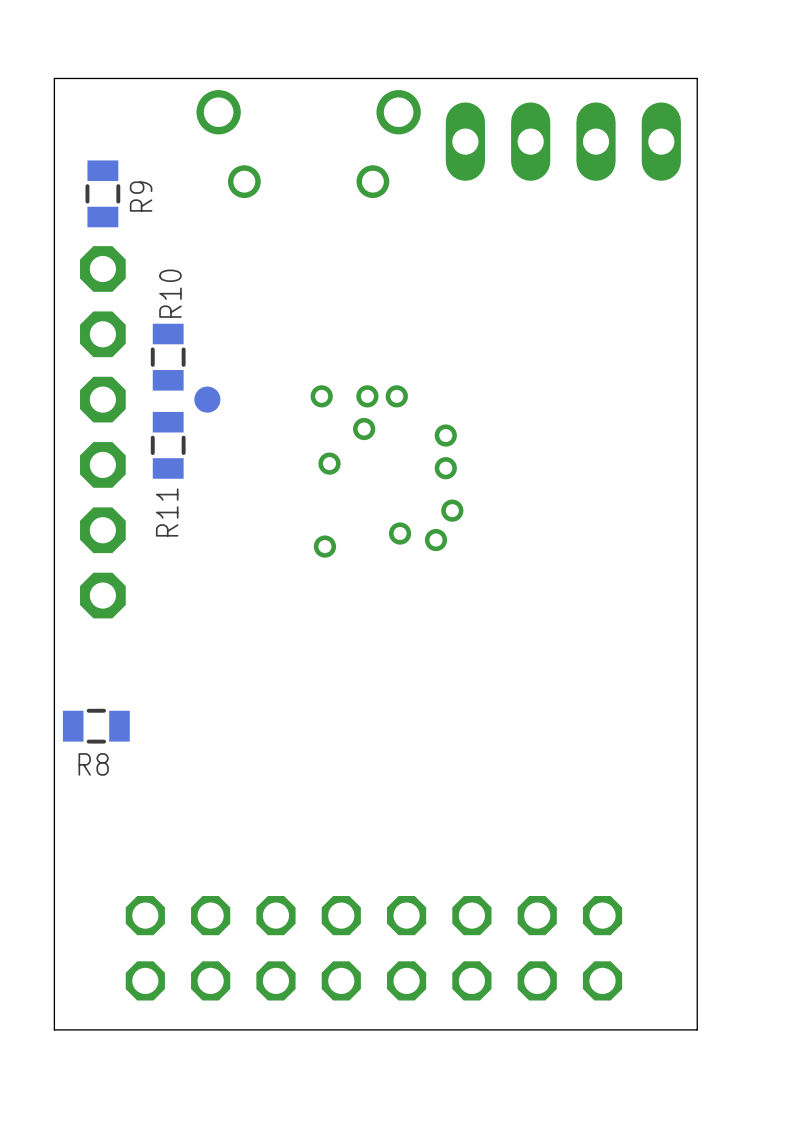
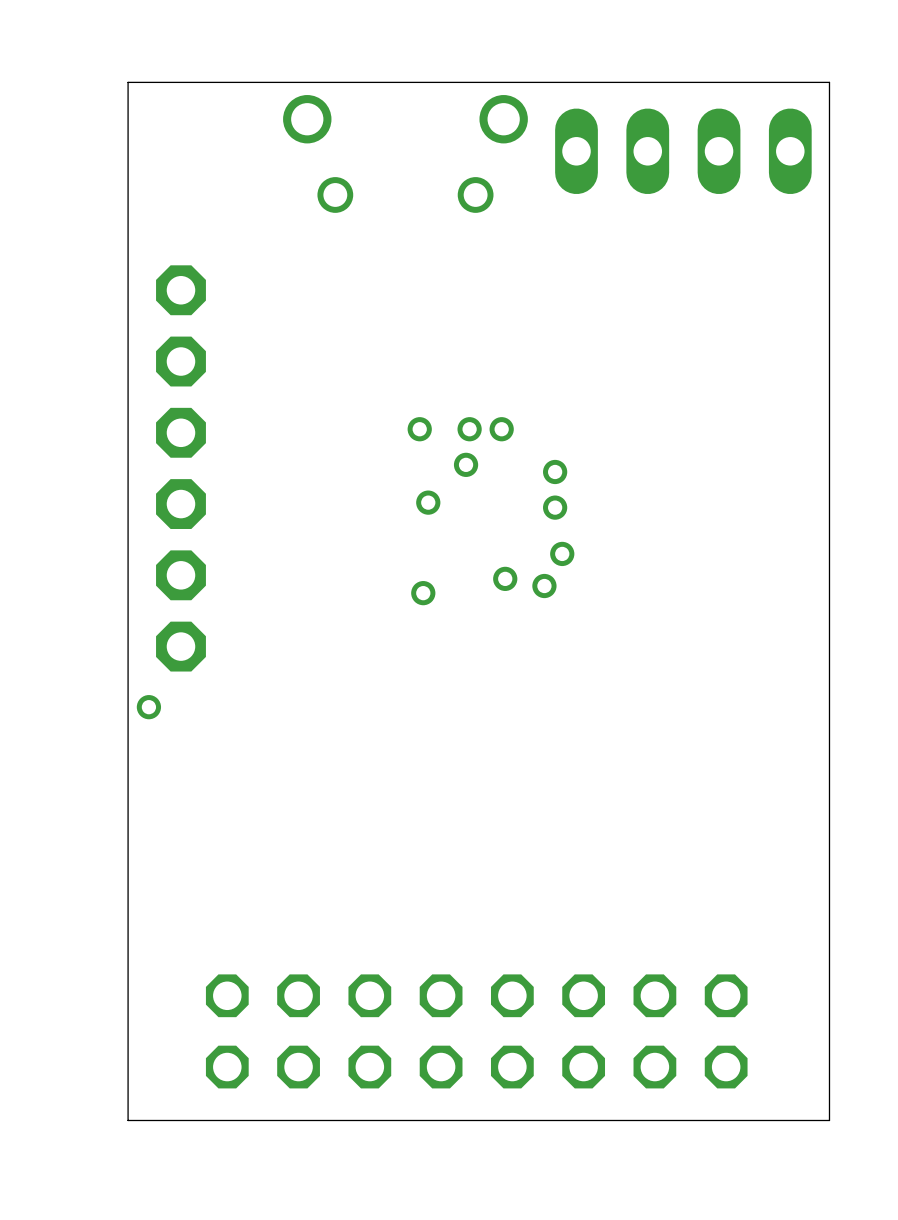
R9: (102, 193) -> none
R10: (168, 357) -> none
part: (207, 399) -> none
R11: (168, 445) -> none
part: none -> (148, 707)
R8: (96, 726) -> none

